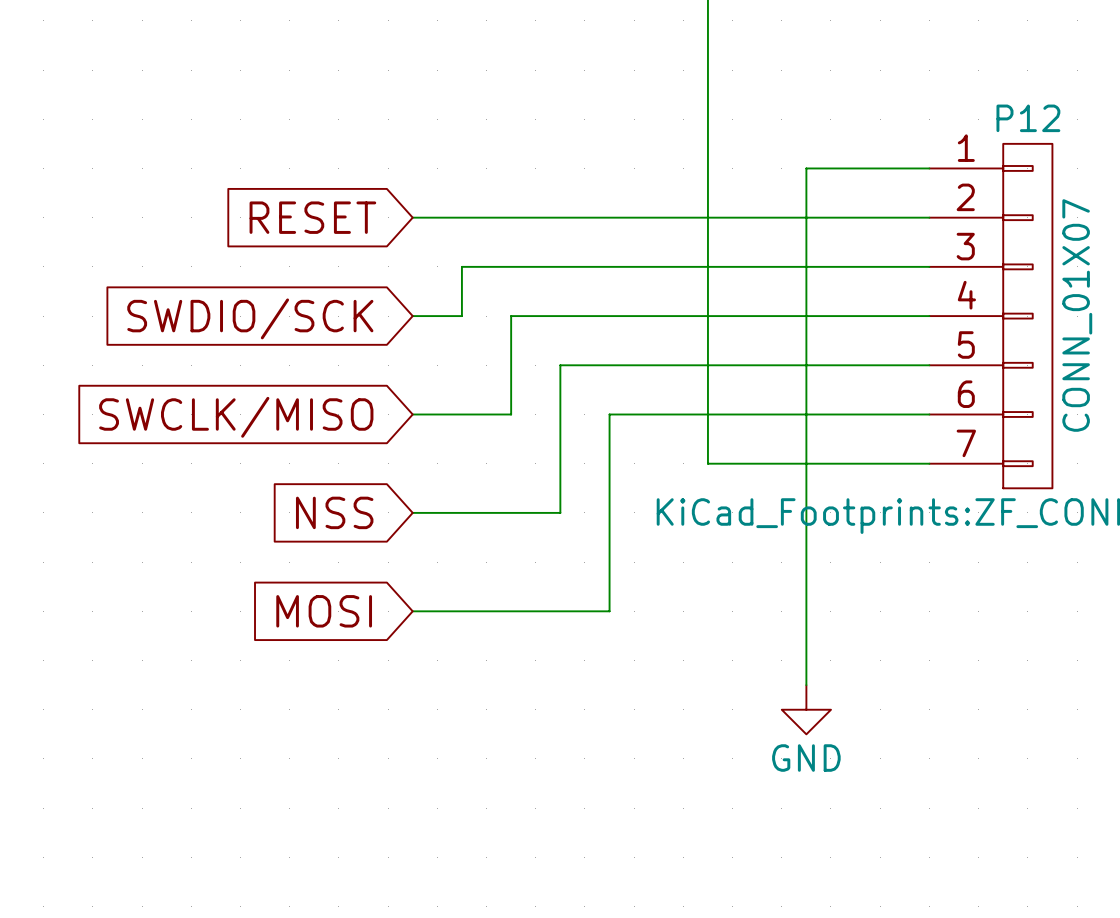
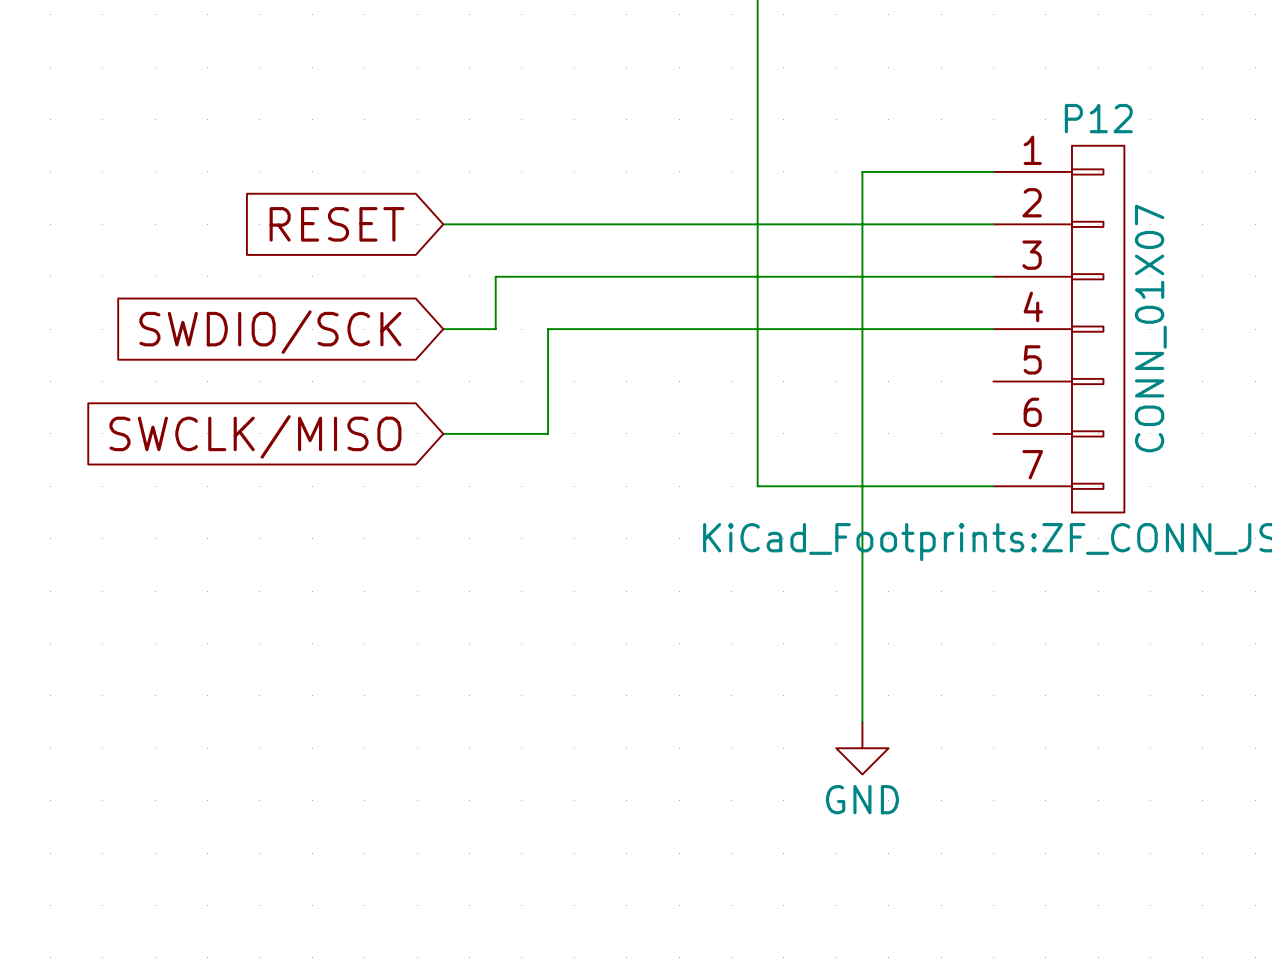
wire: (929, 365) (560, 365) (560, 512) (412, 512) -> none
wire: (929, 414) (609, 414) (609, 611) (412, 611) -> none
global label: NSS (334, 512) -> none
global label: MOSI (324, 611) -> none

